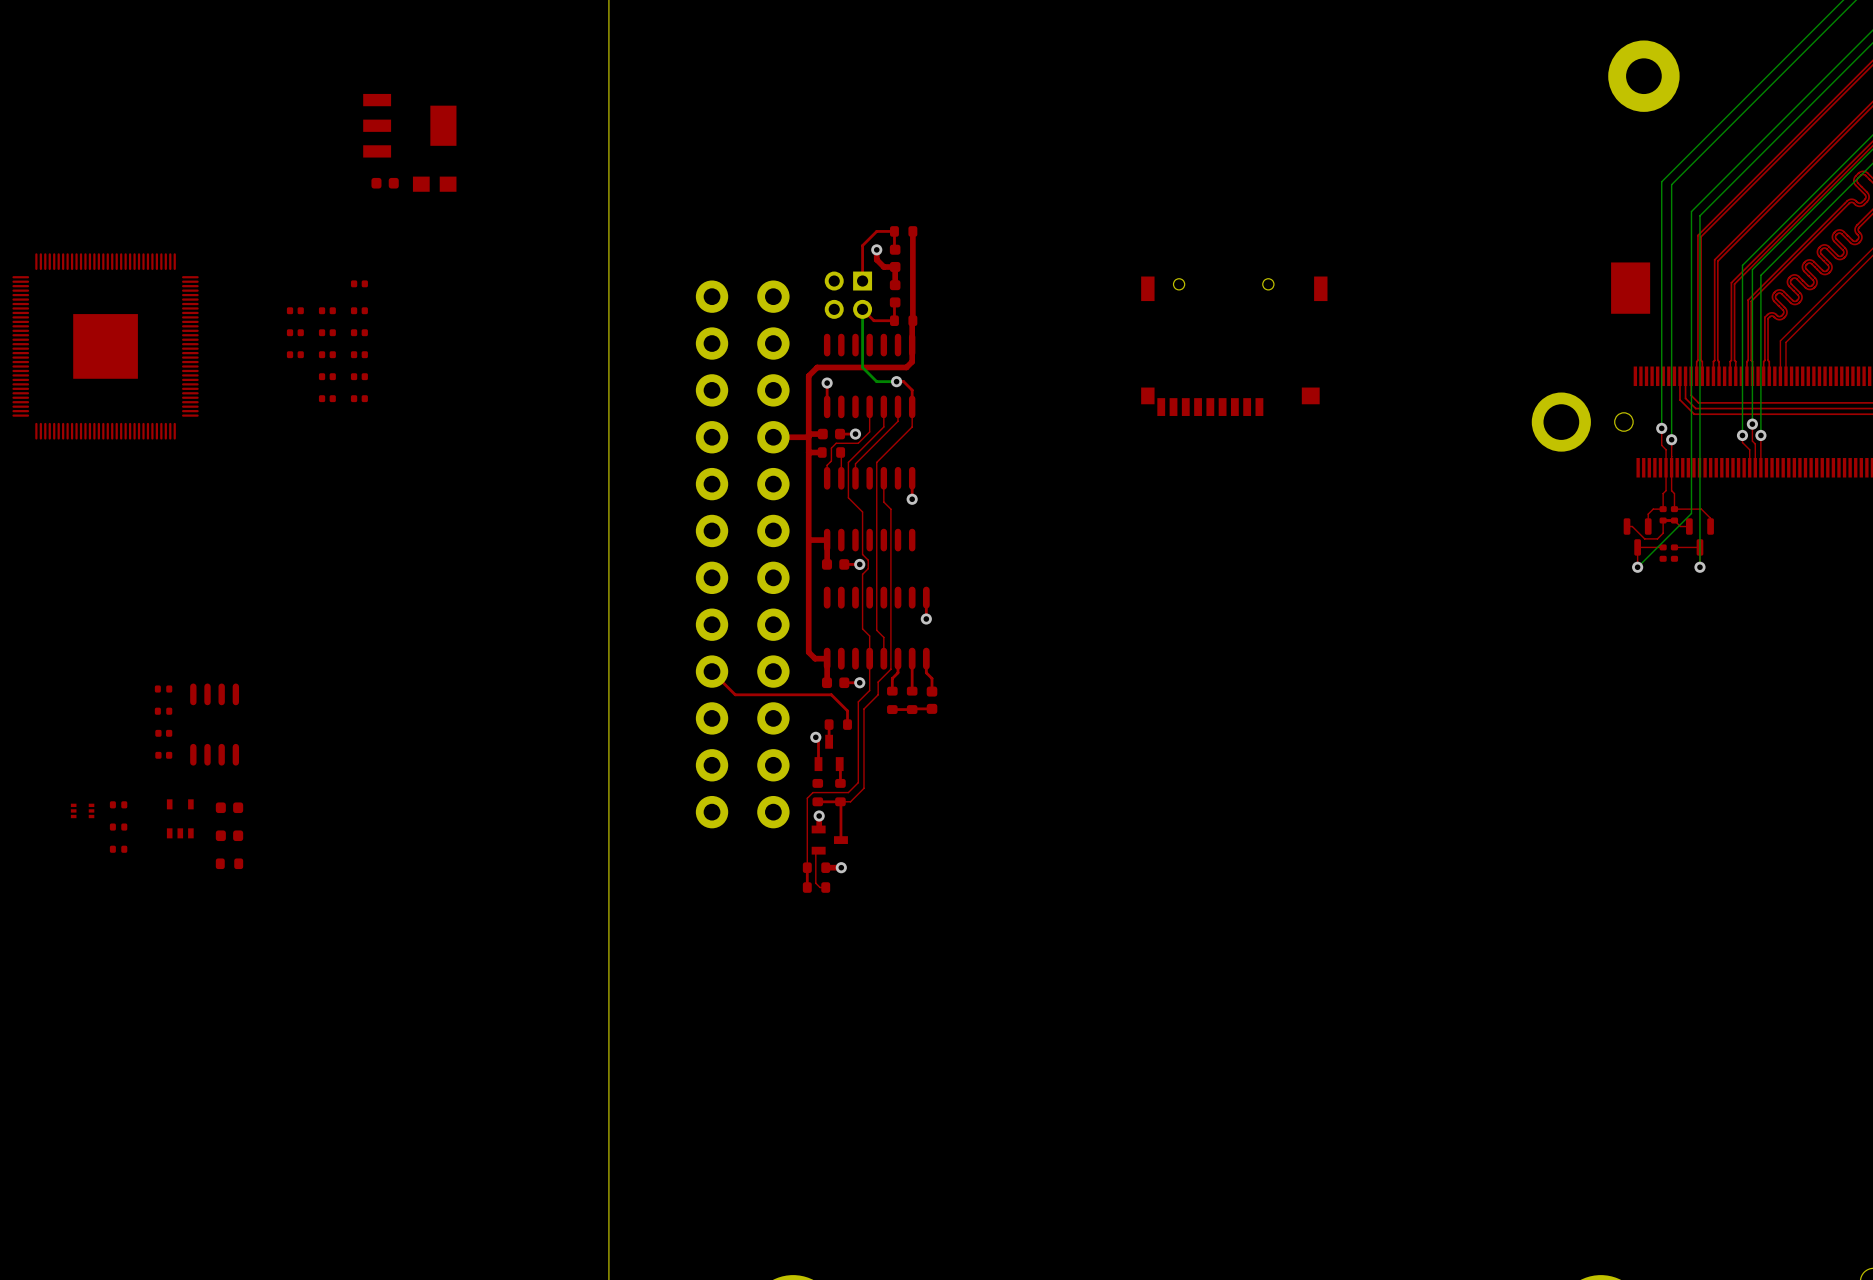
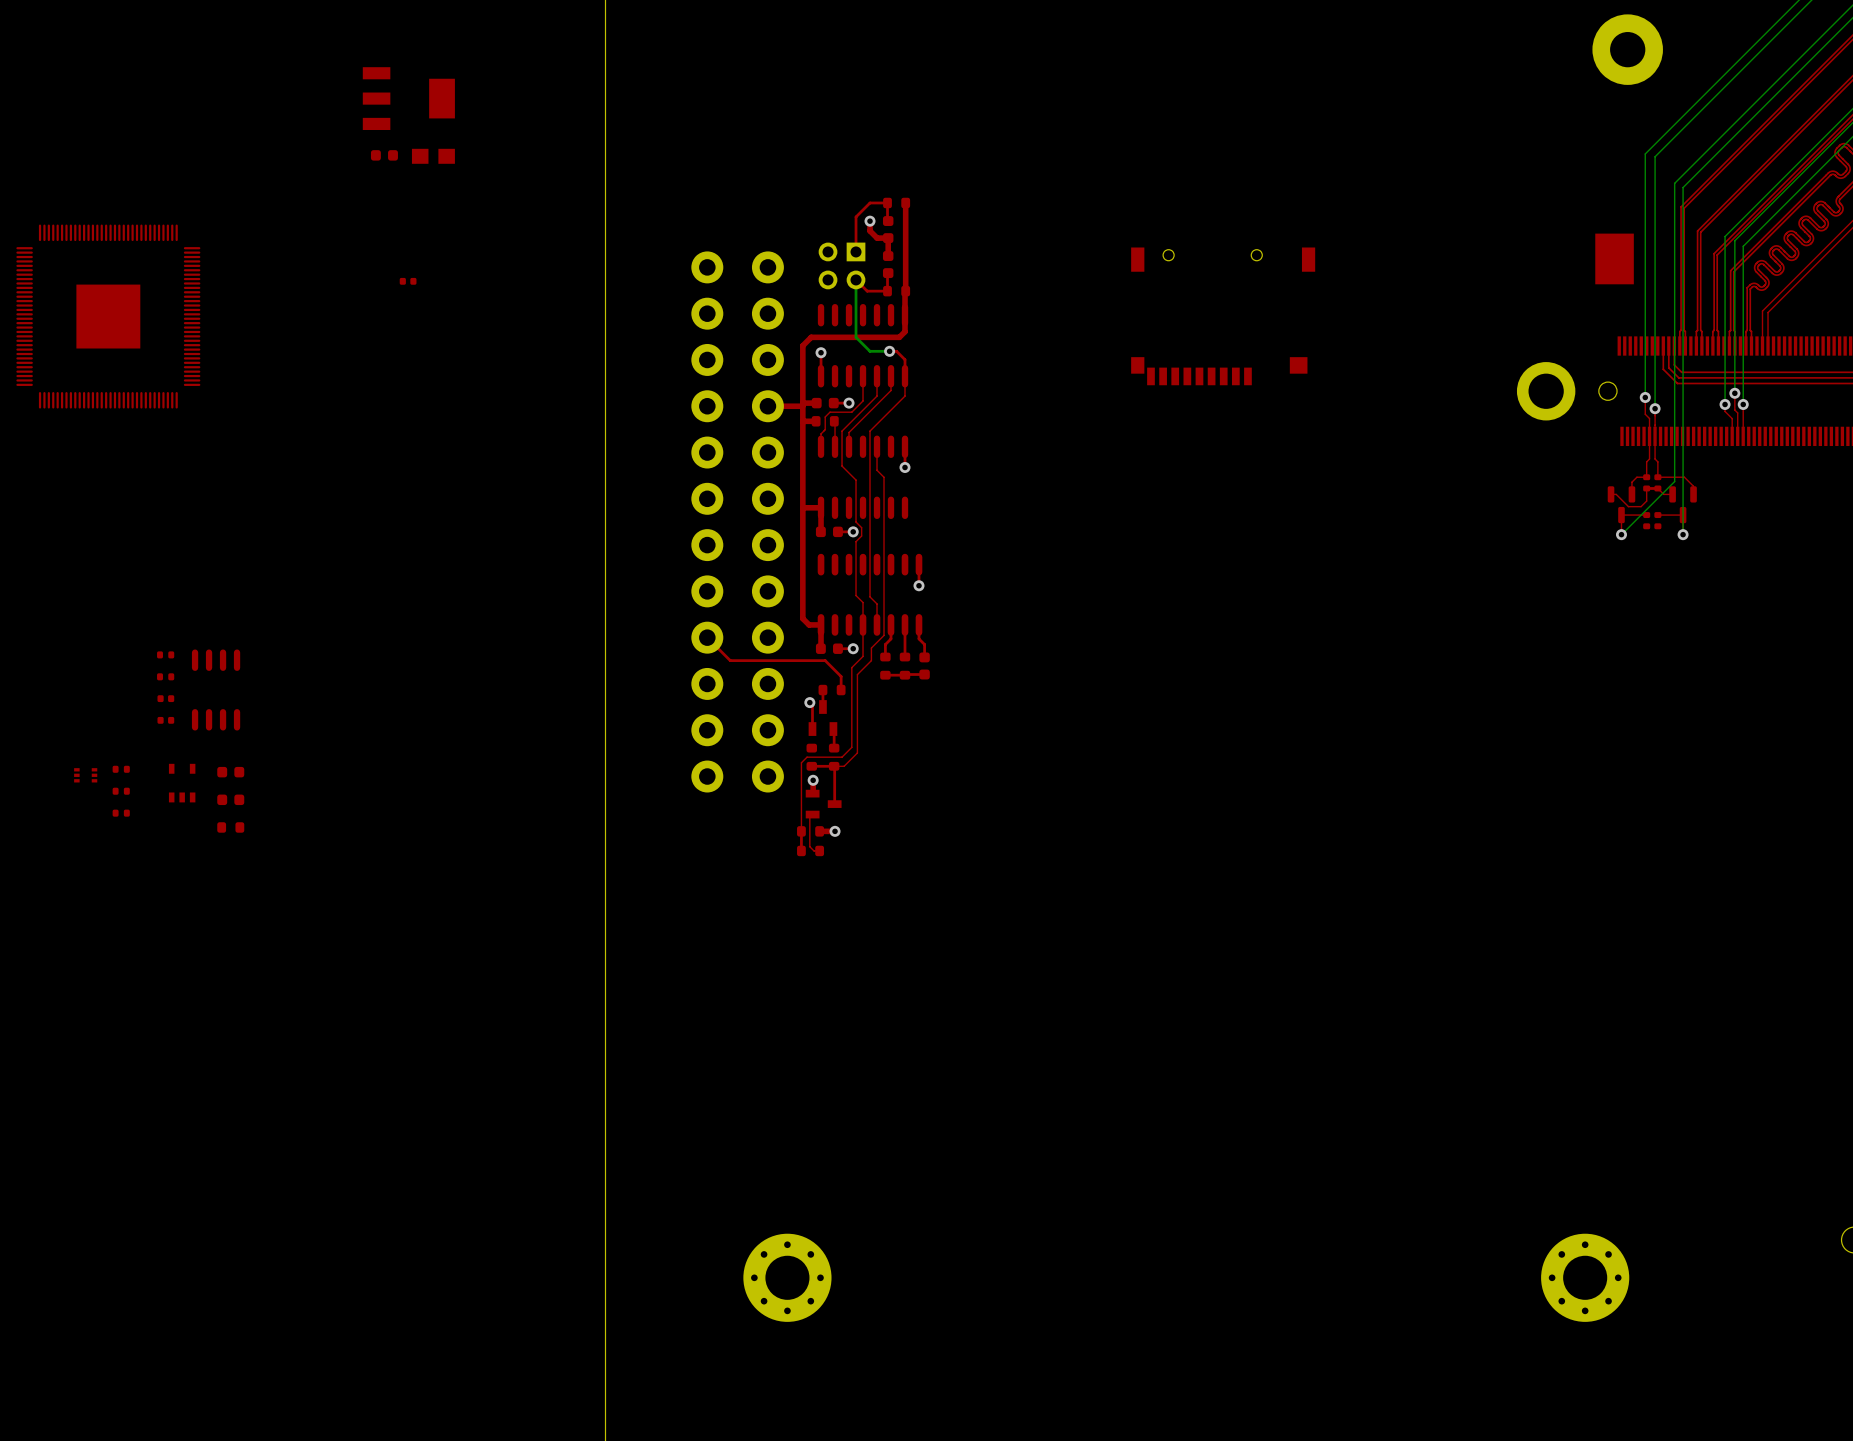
part: (359, 283) -> none
part: (295, 310) -> none
part: (327, 310) -> none
part: (359, 310) -> none
part: none -> (408, 281)
part: (295, 332) -> none
part: (327, 332) -> none
part: (359, 332) -> none
part: (295, 354) -> none
part: (327, 354) -> none
part: (359, 354) -> none
part: (327, 376) -> none
part: (359, 376) -> none
part: (327, 398) -> none
part: (359, 398) -> none

